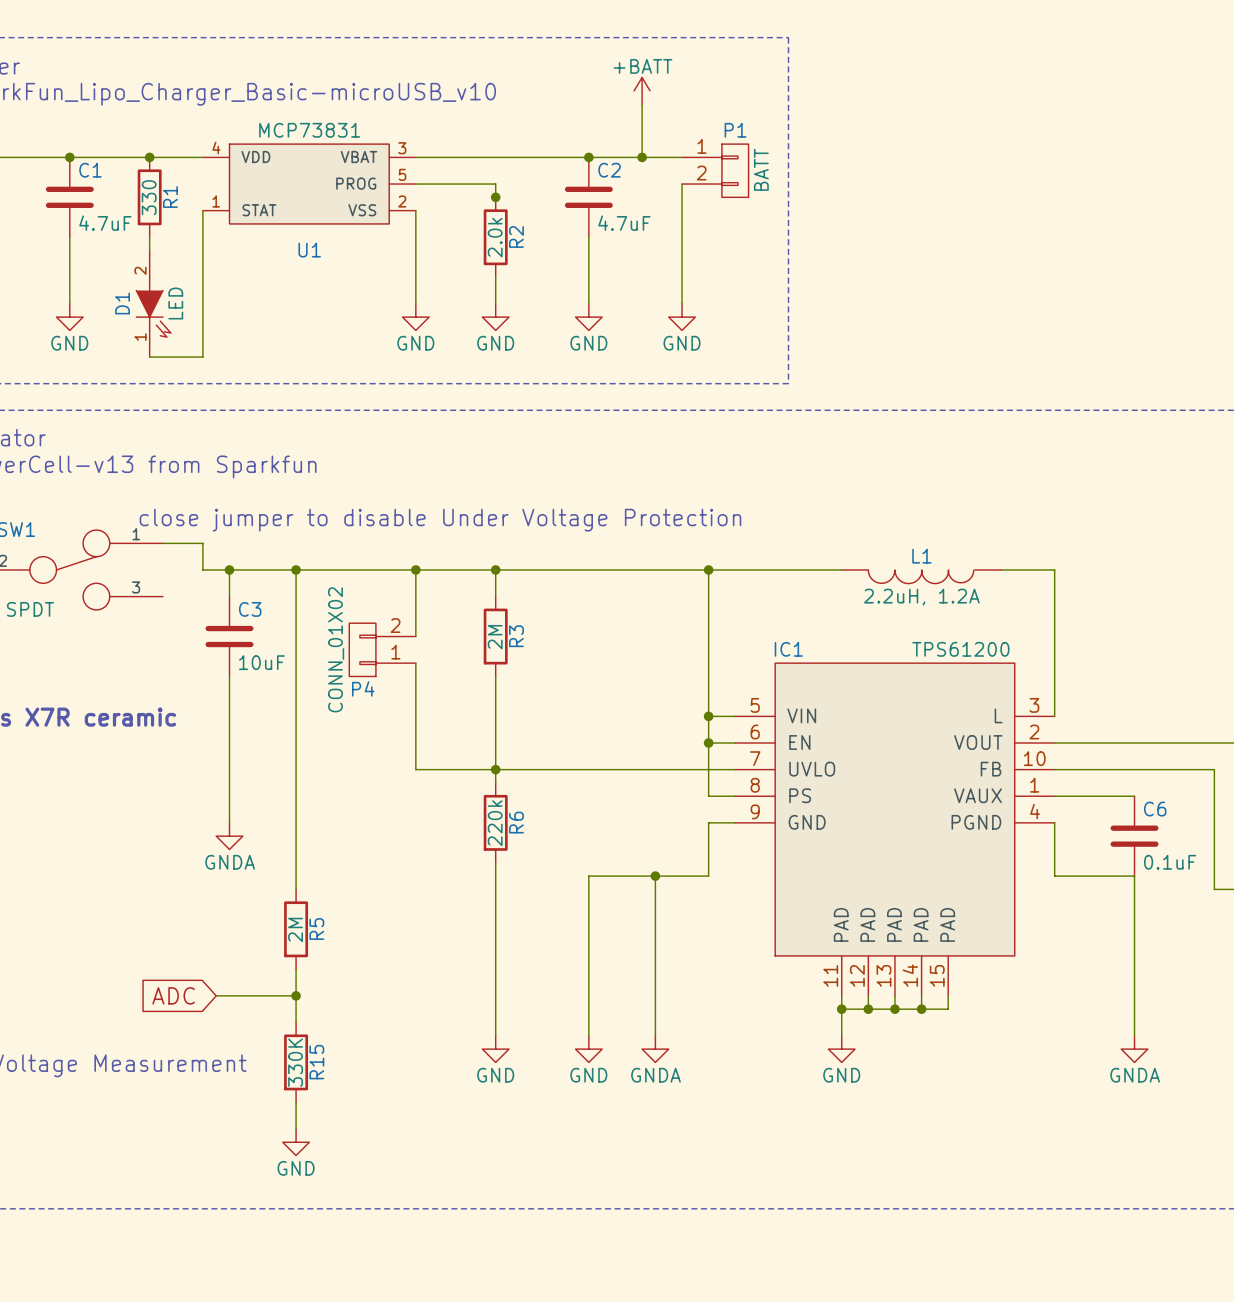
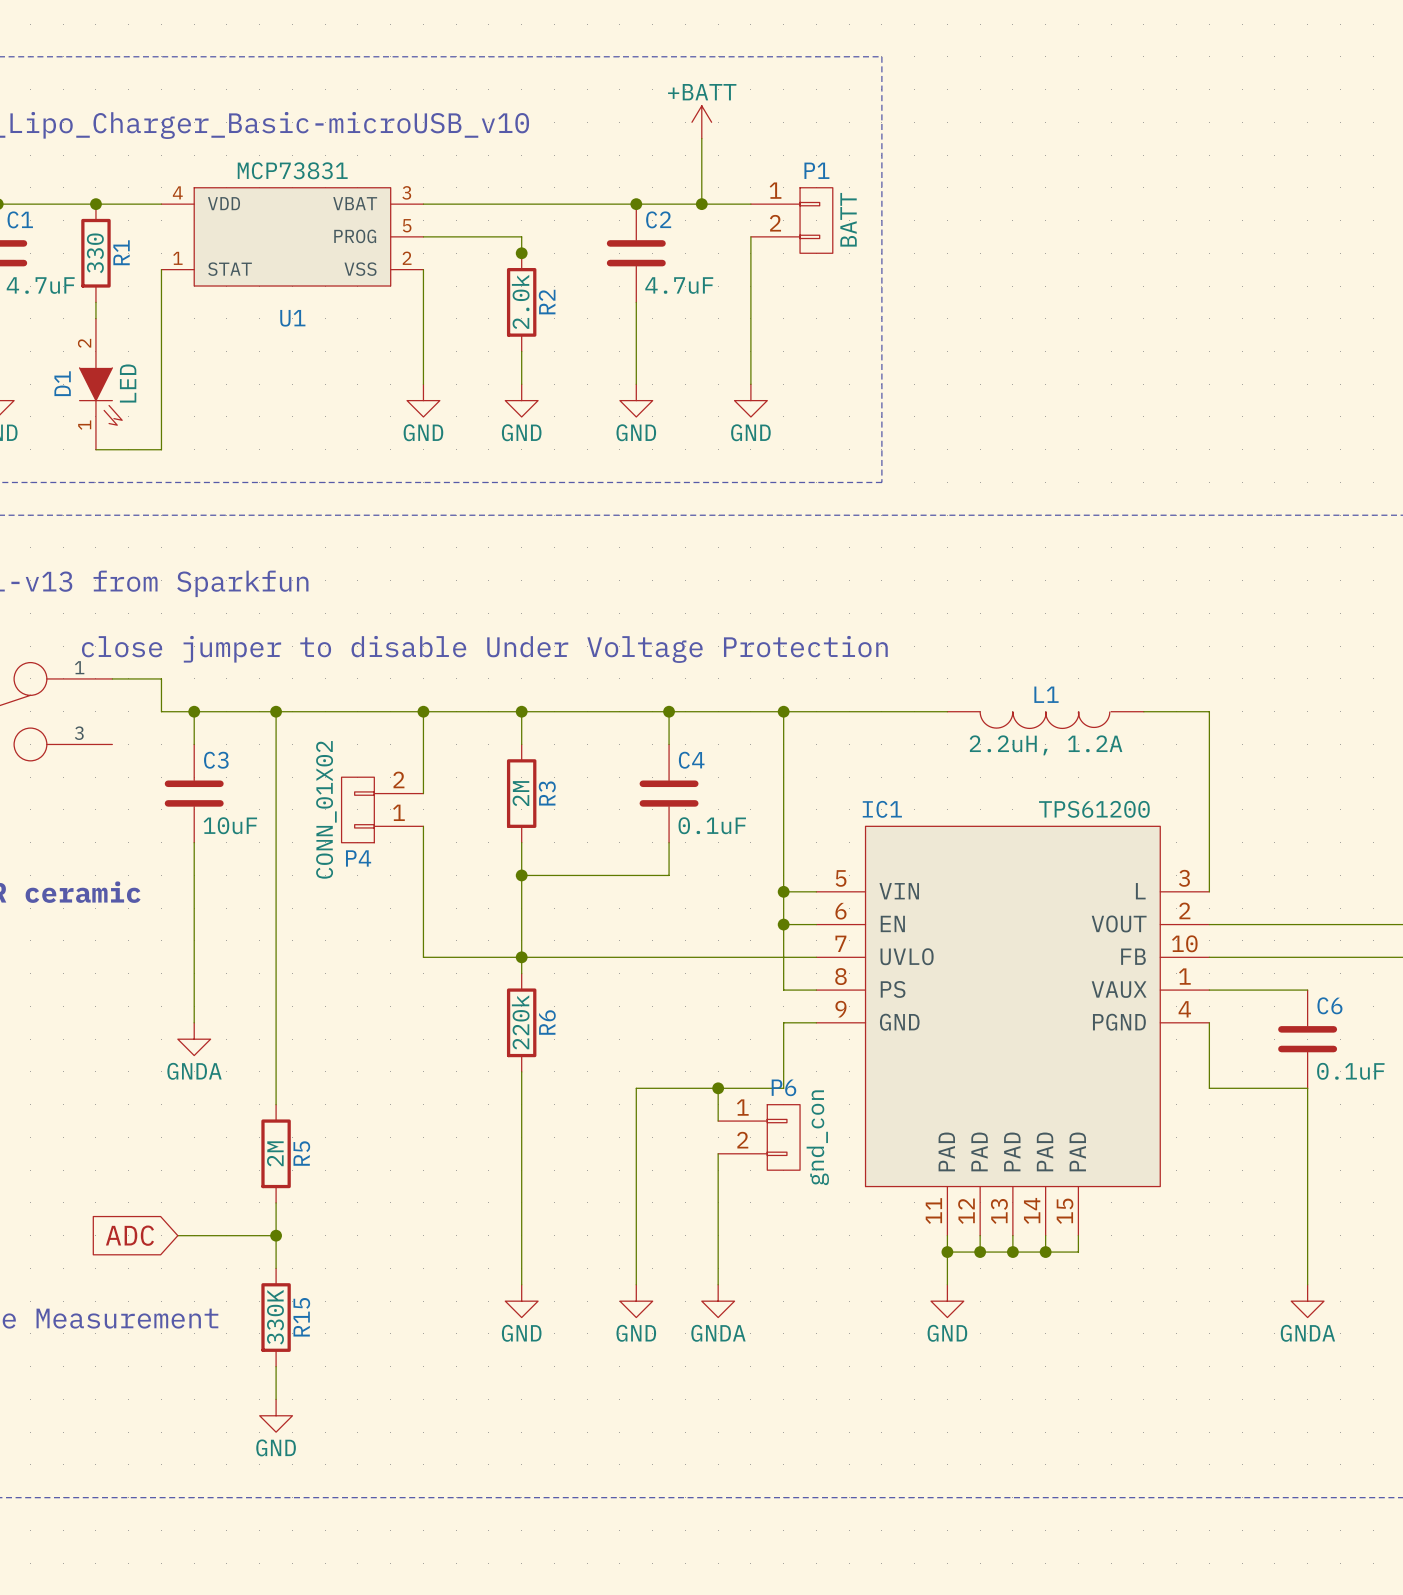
wire: none -> (669, 711) (669, 744)
junction: none -> (669, 711)
C4: none -> 0.1uF (669, 793)
wire: none -> (669, 842) (669, 875) (521, 875)
junction: none -> (521, 875)
wire: (655, 902) (655, 929) -> none
P6: none -> gnd_con (759, 1137)

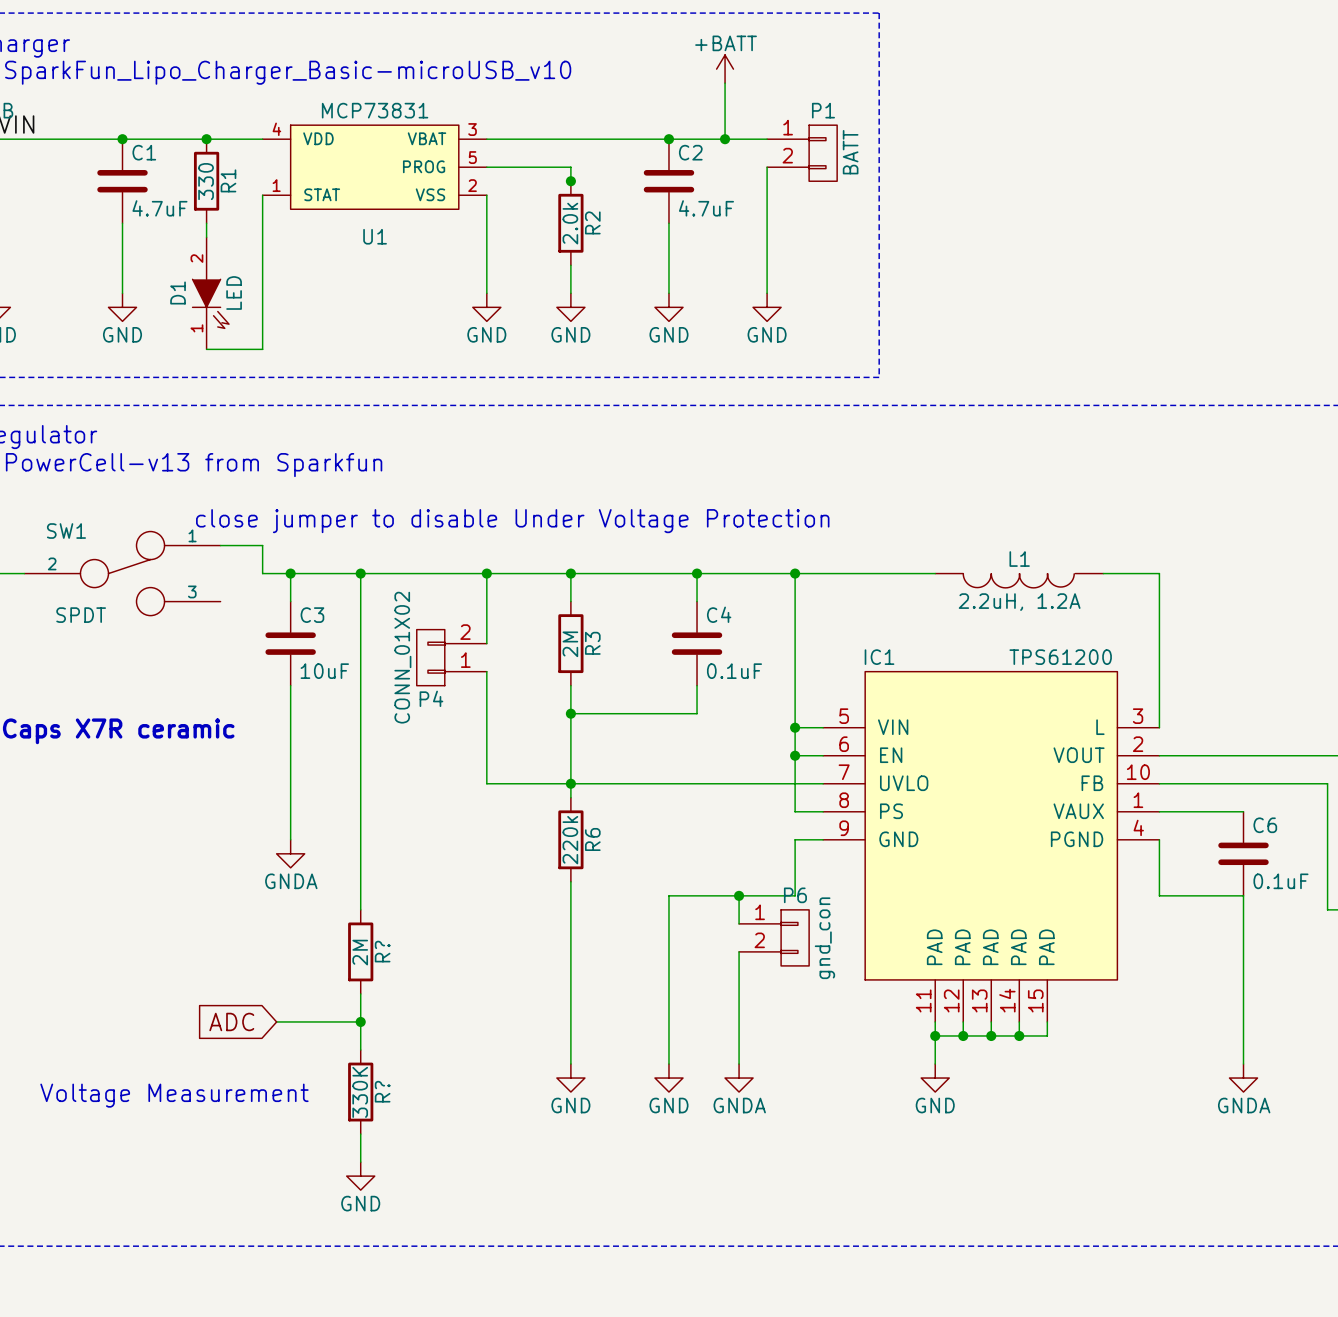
R5 name: R5 (301, 1153) -> R? (382, 951)
R15 name: R15 (301, 1317) -> R? (382, 1091)

